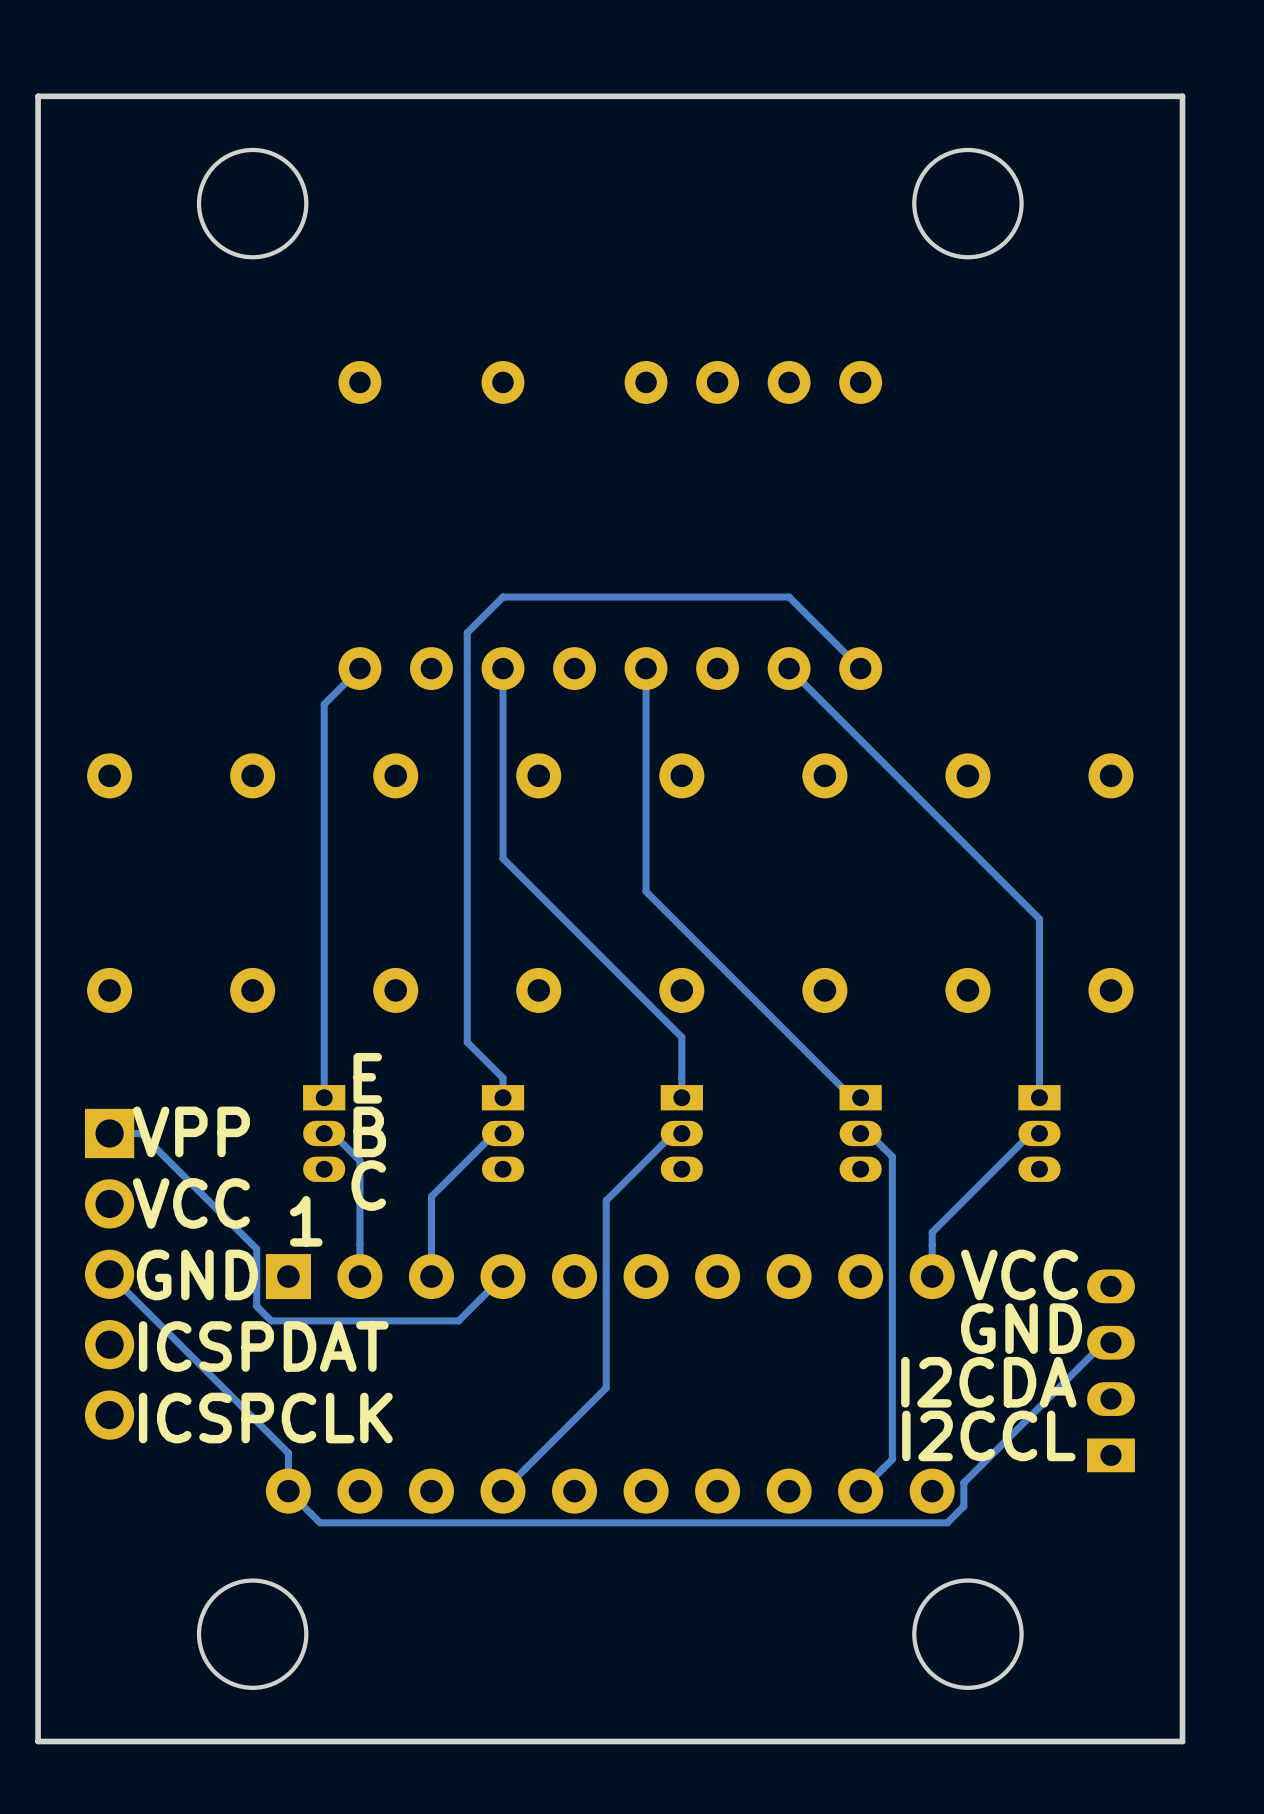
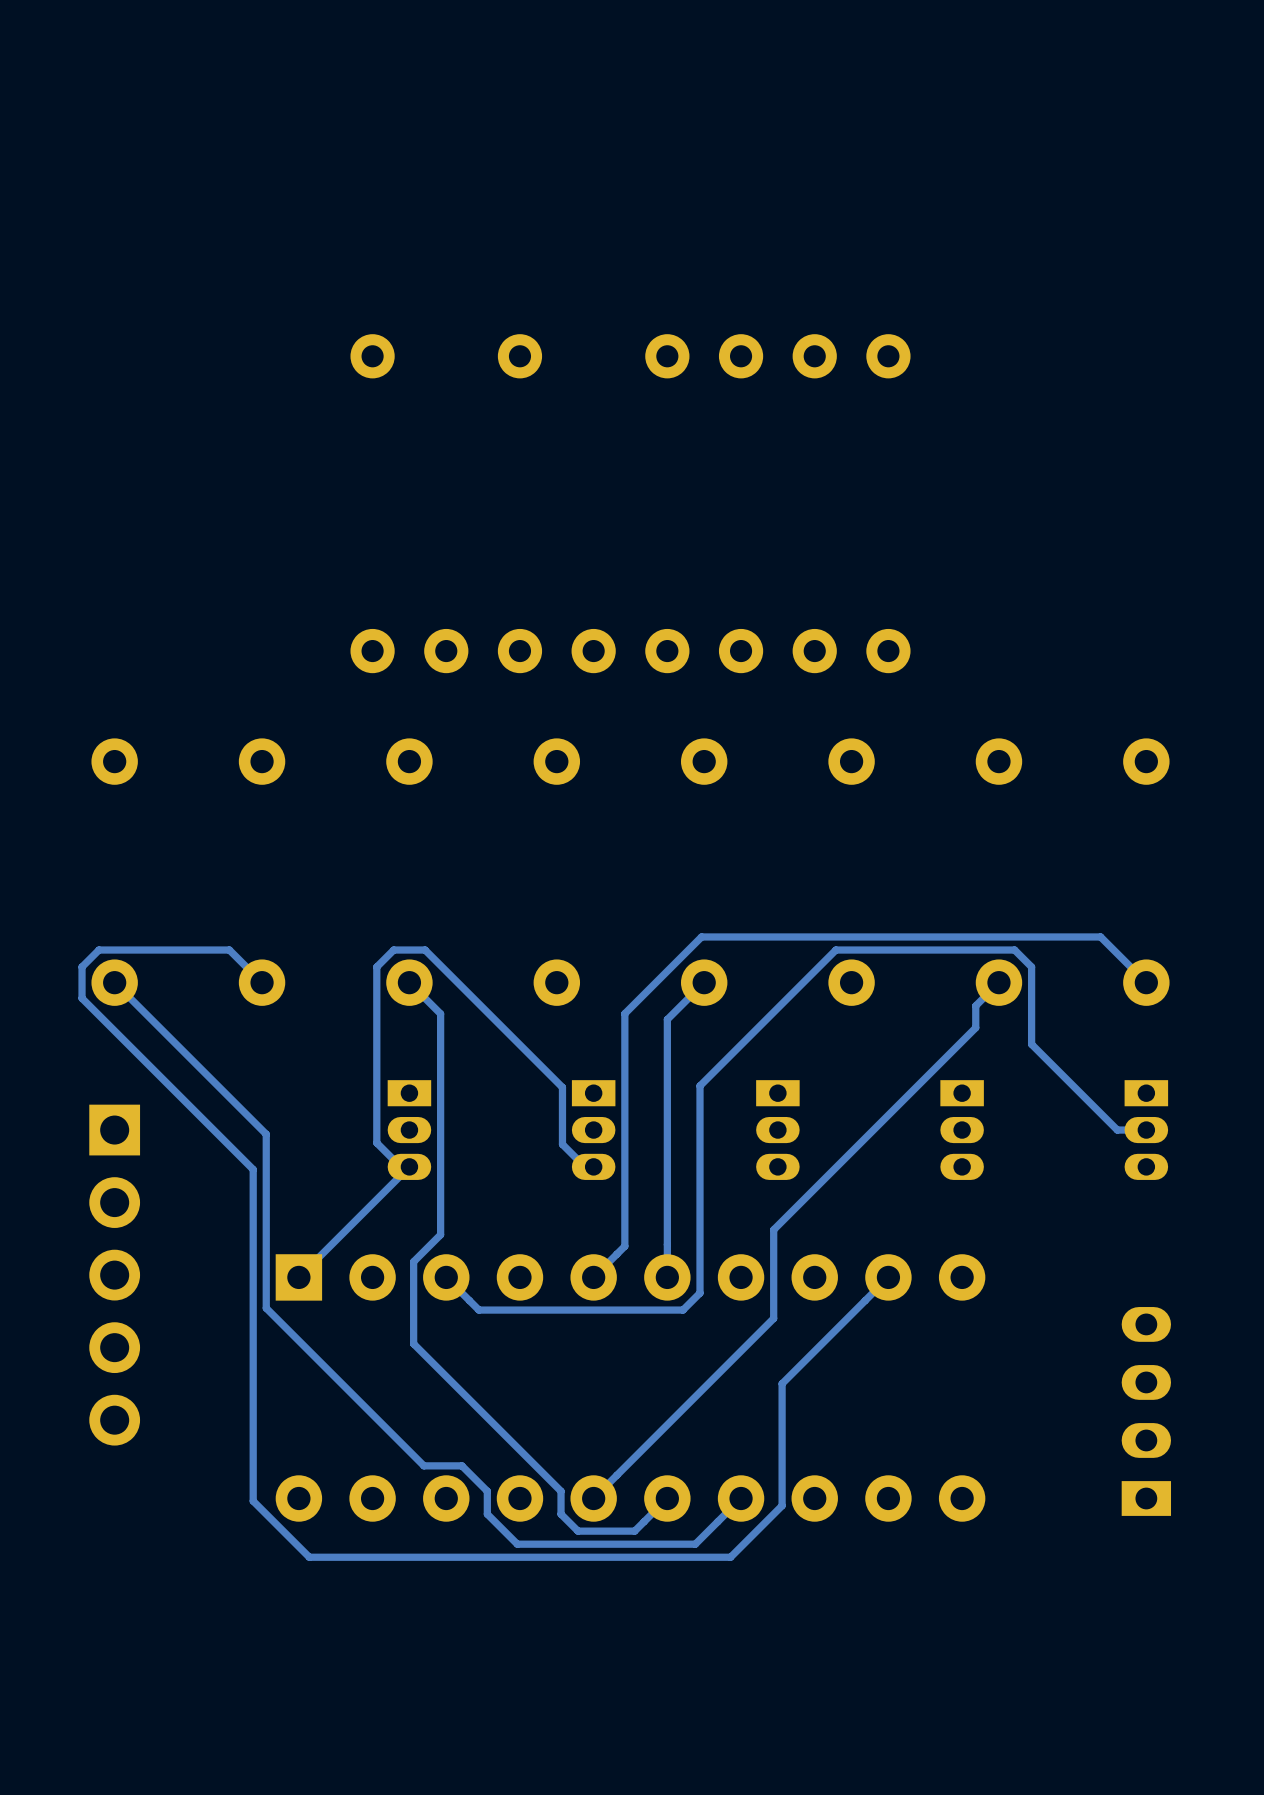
board edge: (1182, 96) (38, 96) (38, 1741) (1182, 1741) (1182, 96) -> none
round board edge: [196, 147, 309, 260] -> none
round board edge: [912, 147, 1024, 260] -> none
track: (359, 668) (324, 704) (324, 1097) -> none
track: (503, 668) (503, 858) (681, 1037) (681, 1097) -> none
track: (646, 668) (646, 891) (852, 1097) (860, 1097) -> none
track: (789, 668) (1039, 918) (1039, 1097) -> none
track: (860, 668) (789, 597) (503, 597) (467, 632) (467, 1042) (503, 1078) (503, 1097) -> none
track: none -> (262, 982) (229, 950) (99, 950) (82, 966) (82, 998) (253, 1169) (253, 1501) (309, 1557) (730, 1557) (782, 1505) (782, 1383) (888, 1277)
track: none -> (704, 982) (667, 1019) (667, 1277)
track: none -> (998, 982) (975, 1005) (975, 1027) (773, 1229) (773, 1318) (593, 1498)
track: none -> (1146, 982) (1100, 936) (701, 936) (624, 1013) (624, 1246) (593, 1277)
text: E (367, 1078) -> none
text: VPP (191, 1131) -> none
text: B (369, 1131) -> none
track: (109, 1133) (141, 1133) (256, 1248) -> (114, 982) (266, 1134) (266, 1248)
track: (324, 1133) (332, 1133) (359, 1160) (359, 1276) -> none
part: (324, 1133) -> none
part: none -> (409, 1130)
track: (503, 1133) (494, 1133) (431, 1196) (431, 1276) -> (1146, 1130) (1117, 1130) (1031, 1044) (1031, 966) (1014, 950) (835, 950) (699, 1085) (699, 1293) (683, 1310) (478, 1310) (446, 1277)
part: (503, 1133) -> none
part: none -> (593, 1130)
track: (681, 1133) (673, 1133) (606, 1200) (606, 1387) (503, 1491) -> none
part: (681, 1133) -> none
part: none -> (777, 1130)
track: (860, 1133) (869, 1133) (892, 1156) (892, 1459) (860, 1491) -> none
part: (860, 1133) -> none
part: none -> (962, 1130)
track: (1039, 1133) (1031, 1133) (932, 1232) (932, 1276) -> none
part: (1039, 1133) -> none
part: none -> (1146, 1130)
track: none -> (593, 1166) (584, 1166) (562, 1144) (562, 1087) (425, 950) (393, 950) (376, 966) (376, 1142) (400, 1166) (409, 1166) (298, 1277)
text: C (368, 1185) -> none
text: VCC (191, 1203) -> none
text: 1 (306, 1221) -> none
track: (109, 1274) (288, 1453) (288, 1491) (320, 1522) (559, 1522) -> (409, 982) (440, 1013) (440, 1234) (413, 1261) (413, 1343) (561, 1491) (561, 1514) (577, 1531)
text: GND (197, 1274) -> none
text: VCC (1019, 1274) -> none
track: (503, 1276) (458, 1320) (271, 1320) -> (741, 1498) (695, 1544) (517, 1544) (487, 1514) (487, 1491) (461, 1465) (423, 1465) (281, 1323)
text: GND (1021, 1328) -> none
track: (1110, 1342) (1103, 1342) (963, 1482) (963, 1506) (947, 1522) (614, 1522) -> (667, 1498) (634, 1531)
text: ICSPDAT (263, 1346) -> none
part position: (1110, 1370) -> (1146, 1411)
text: I2CDA (988, 1382) -> none
text: ICSPCLK (265, 1418) -> none
text: I2CCL (988, 1435) -> none
round board edge: [196, 1578, 309, 1690] -> none
round board edge: [912, 1578, 1024, 1690] -> none

